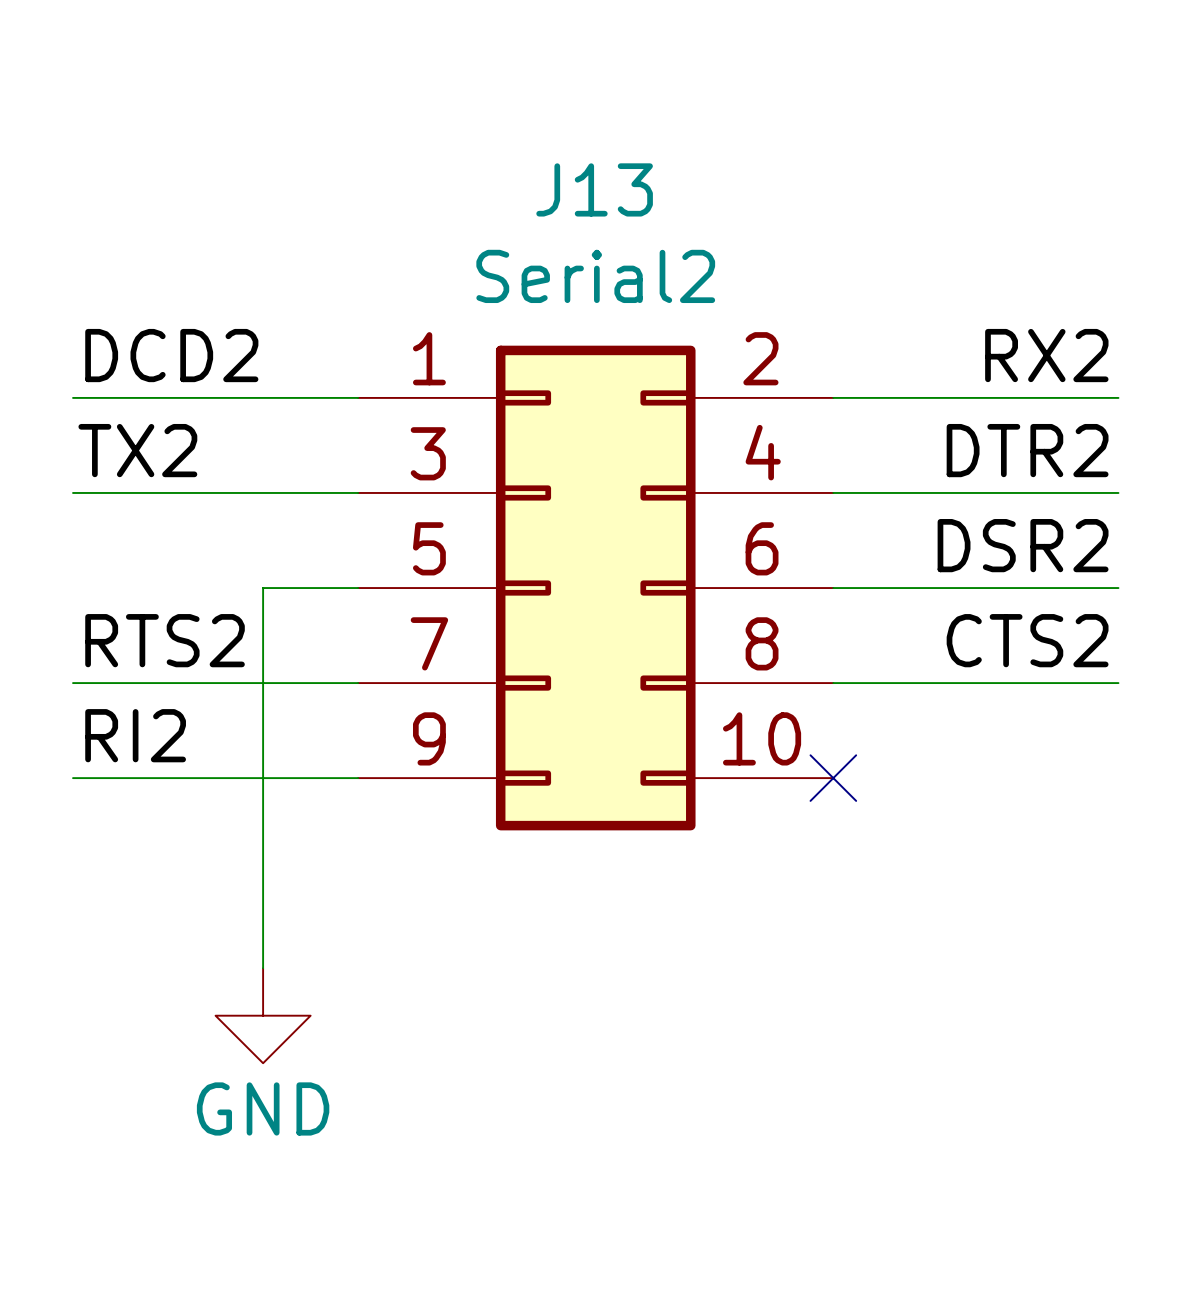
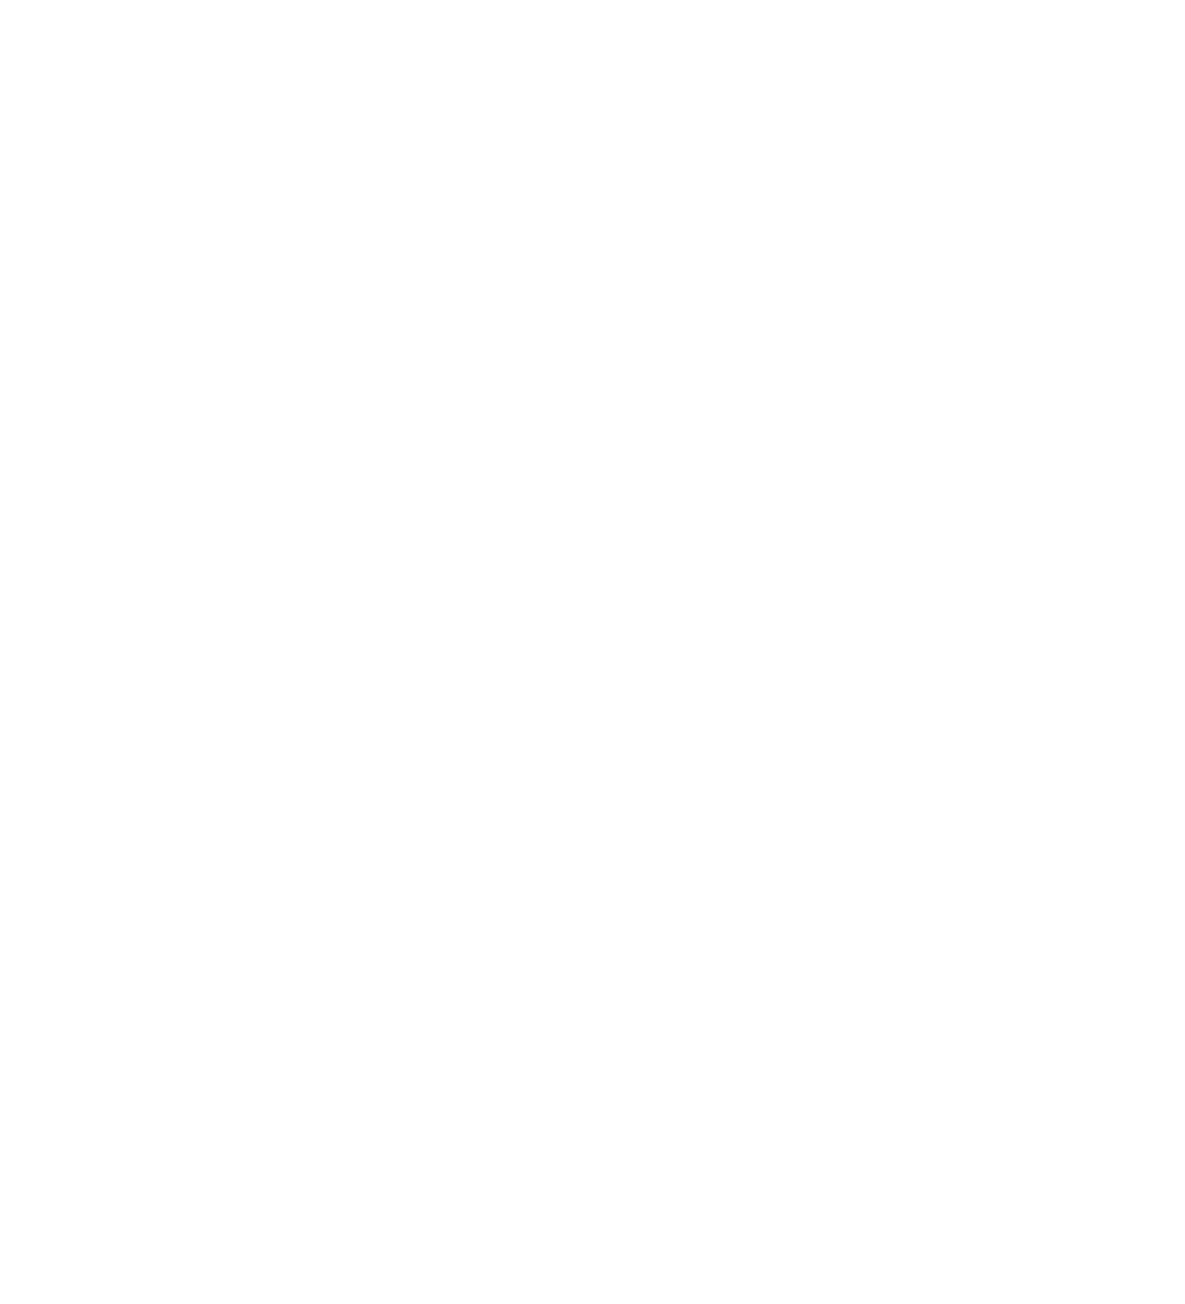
label: DCD2 (171, 355) -> none
label: RX2 (1046, 355) -> none
wire: (73, 397) (358, 397) -> none
wire: (833, 397) (1118, 397) -> none
label: TX2 (137, 450) -> none
label: DTR2 (1027, 450) -> none
wire: (73, 492) (358, 492) -> none
wire: (833, 492) (1118, 492) -> none
label: DSR2 (1023, 545) -> none
wire: (358, 588) (263, 588) (263, 968) -> none
J13: Serial2 (595, 588) -> none
wire: (833, 588) (1118, 588) -> none
label: RTS2 (165, 640) -> none
label: CTS2 (1027, 640) -> none
wire: (73, 683) (358, 683) -> none
wire: (833, 683) (1118, 683) -> none
label: RI2 (135, 735) -> none
wire: (73, 778) (358, 778) -> none
no-connect mark: (833, 778) -> none
power symbol: GND (263, 1015) -> none

